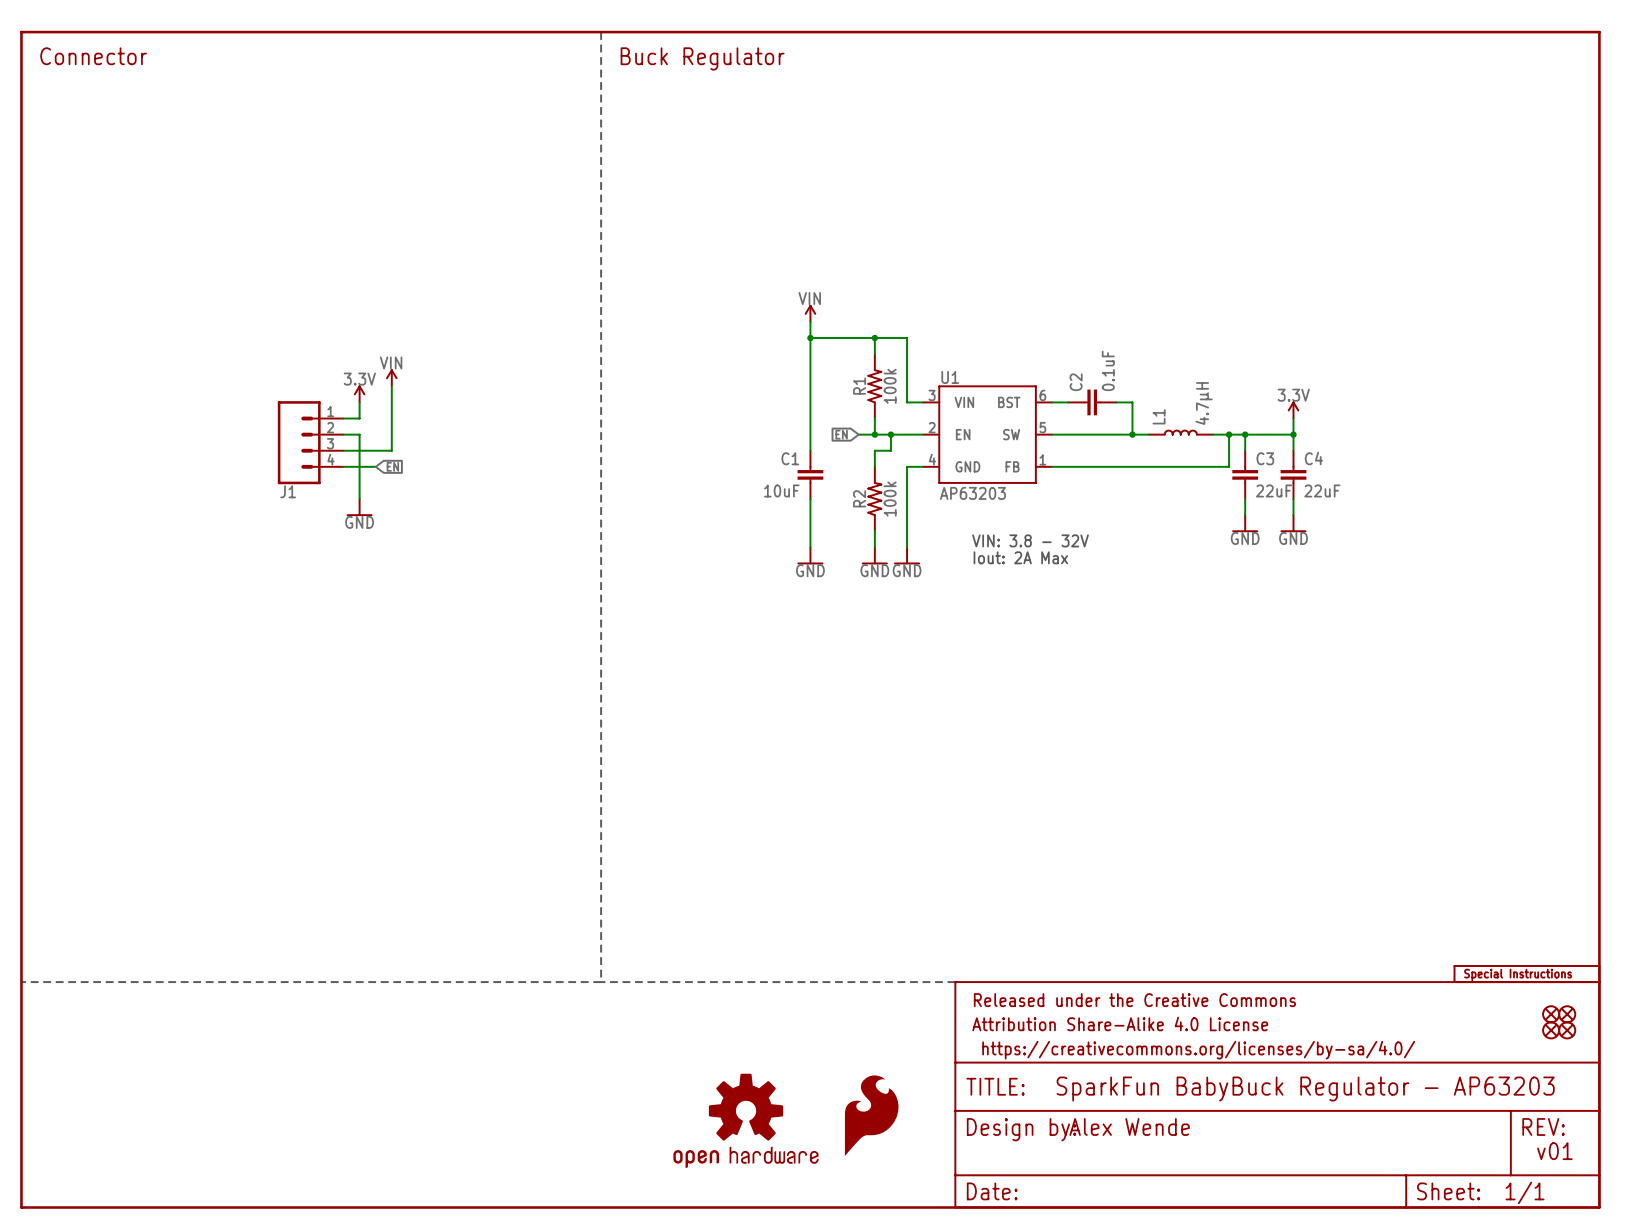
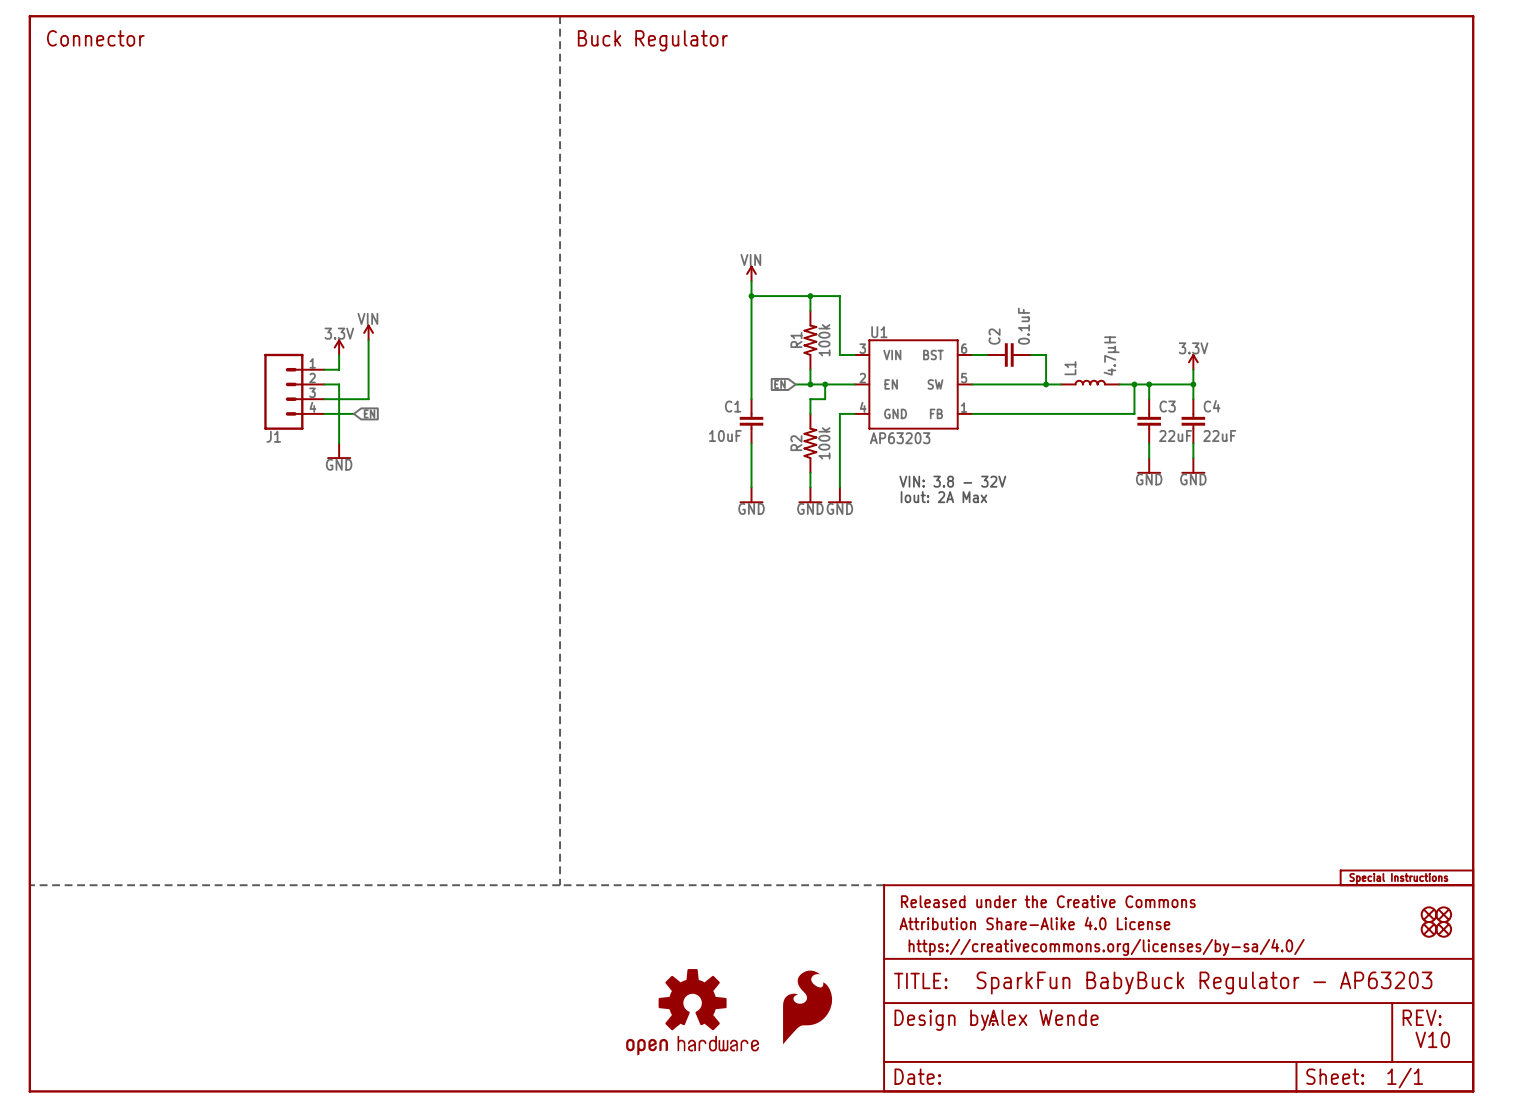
text: v01 (1554, 1151) -> V10 (1432, 1039)

